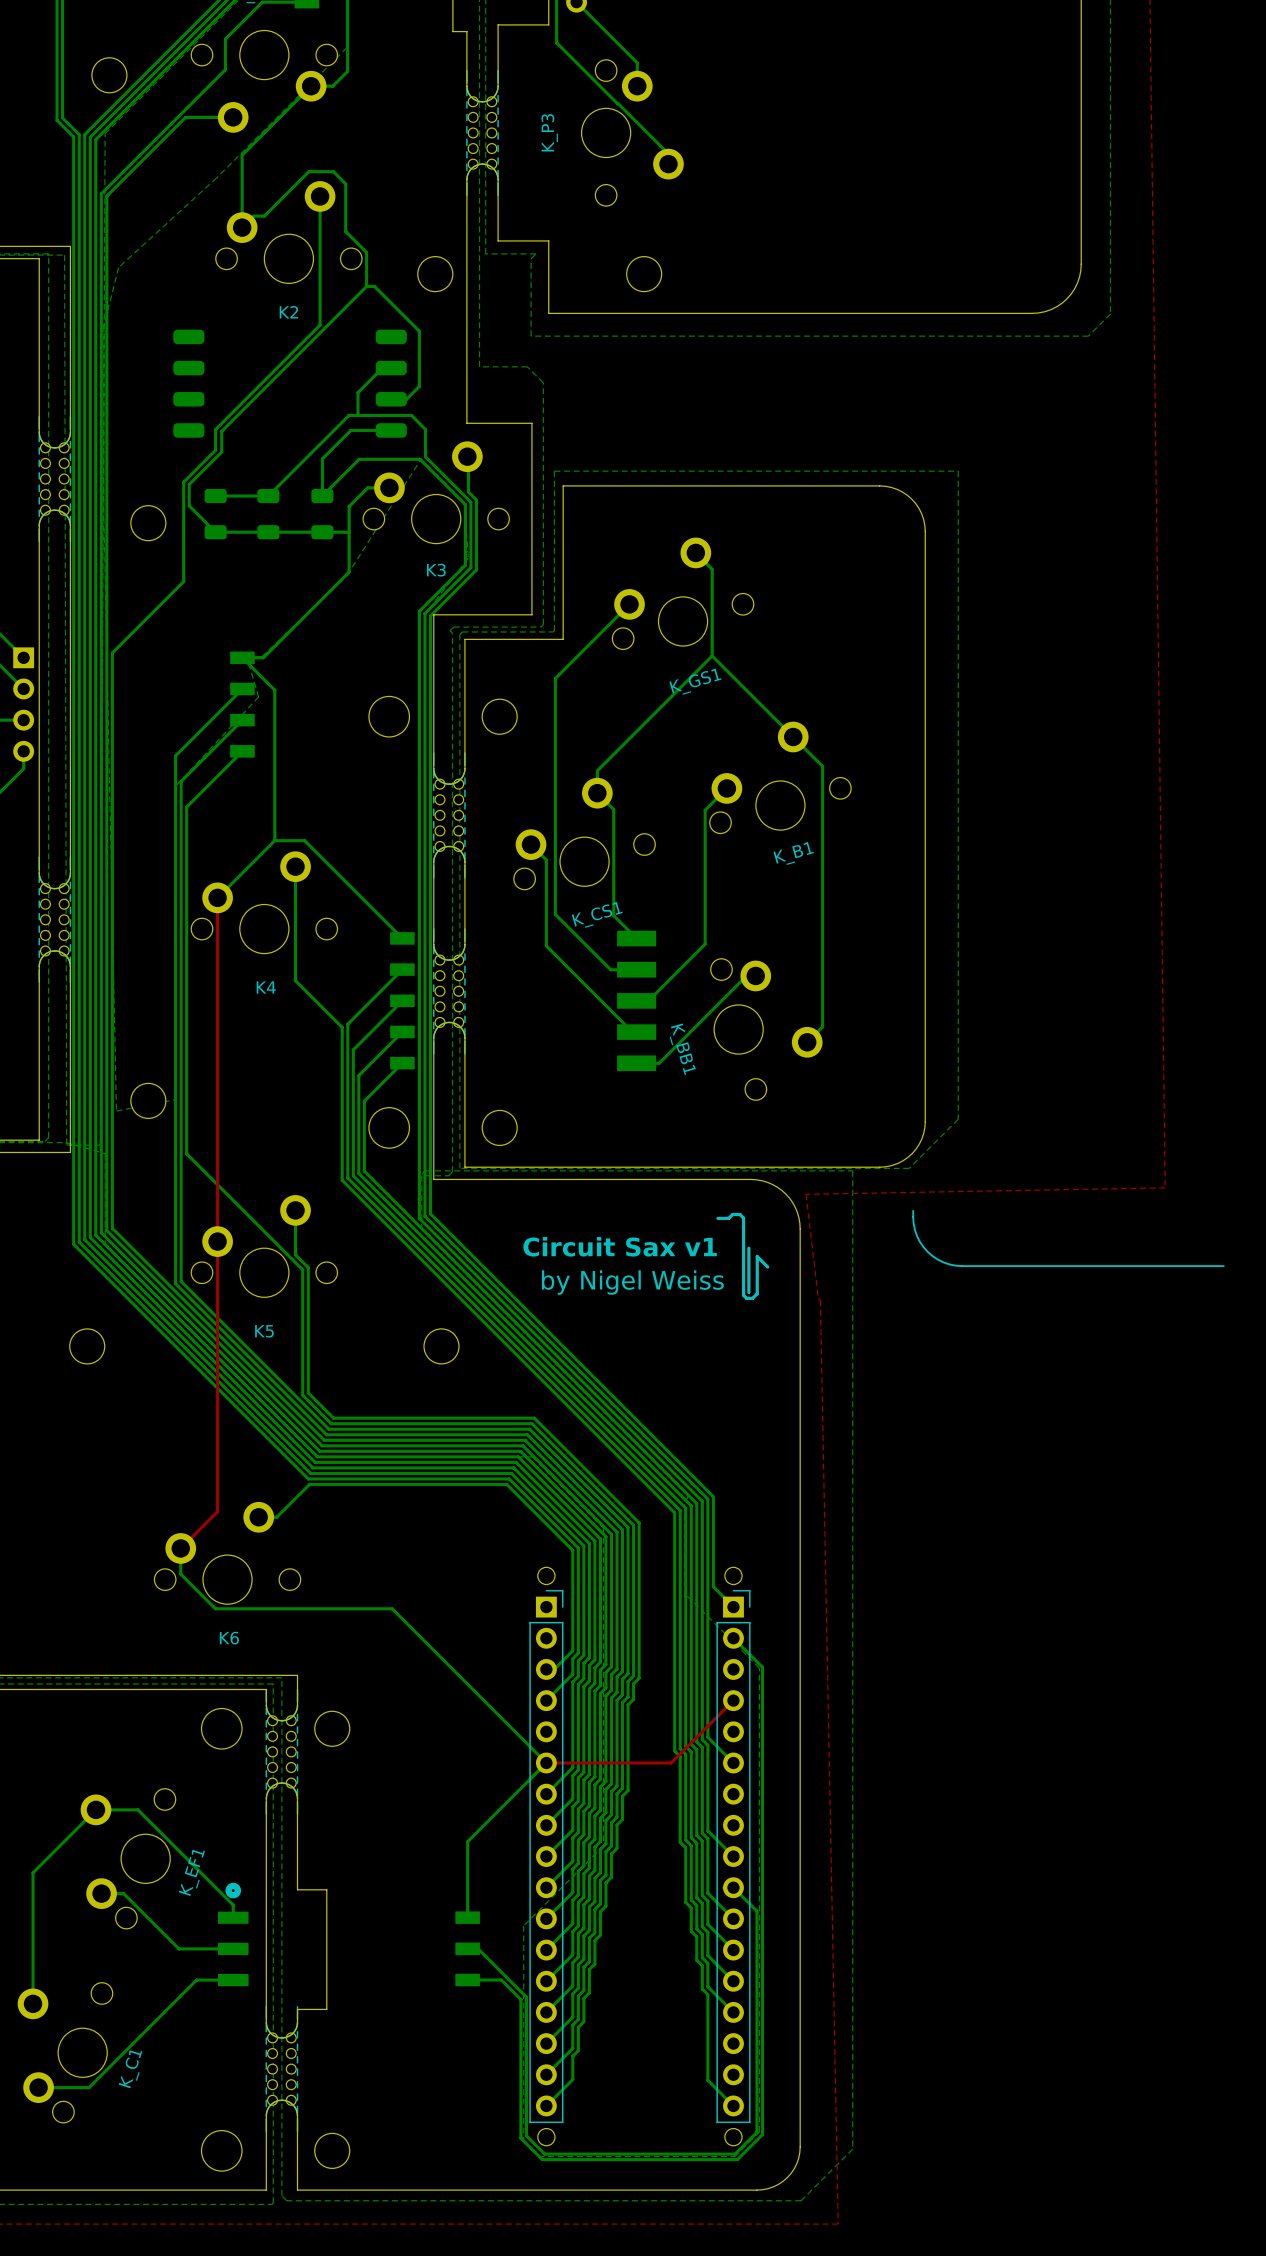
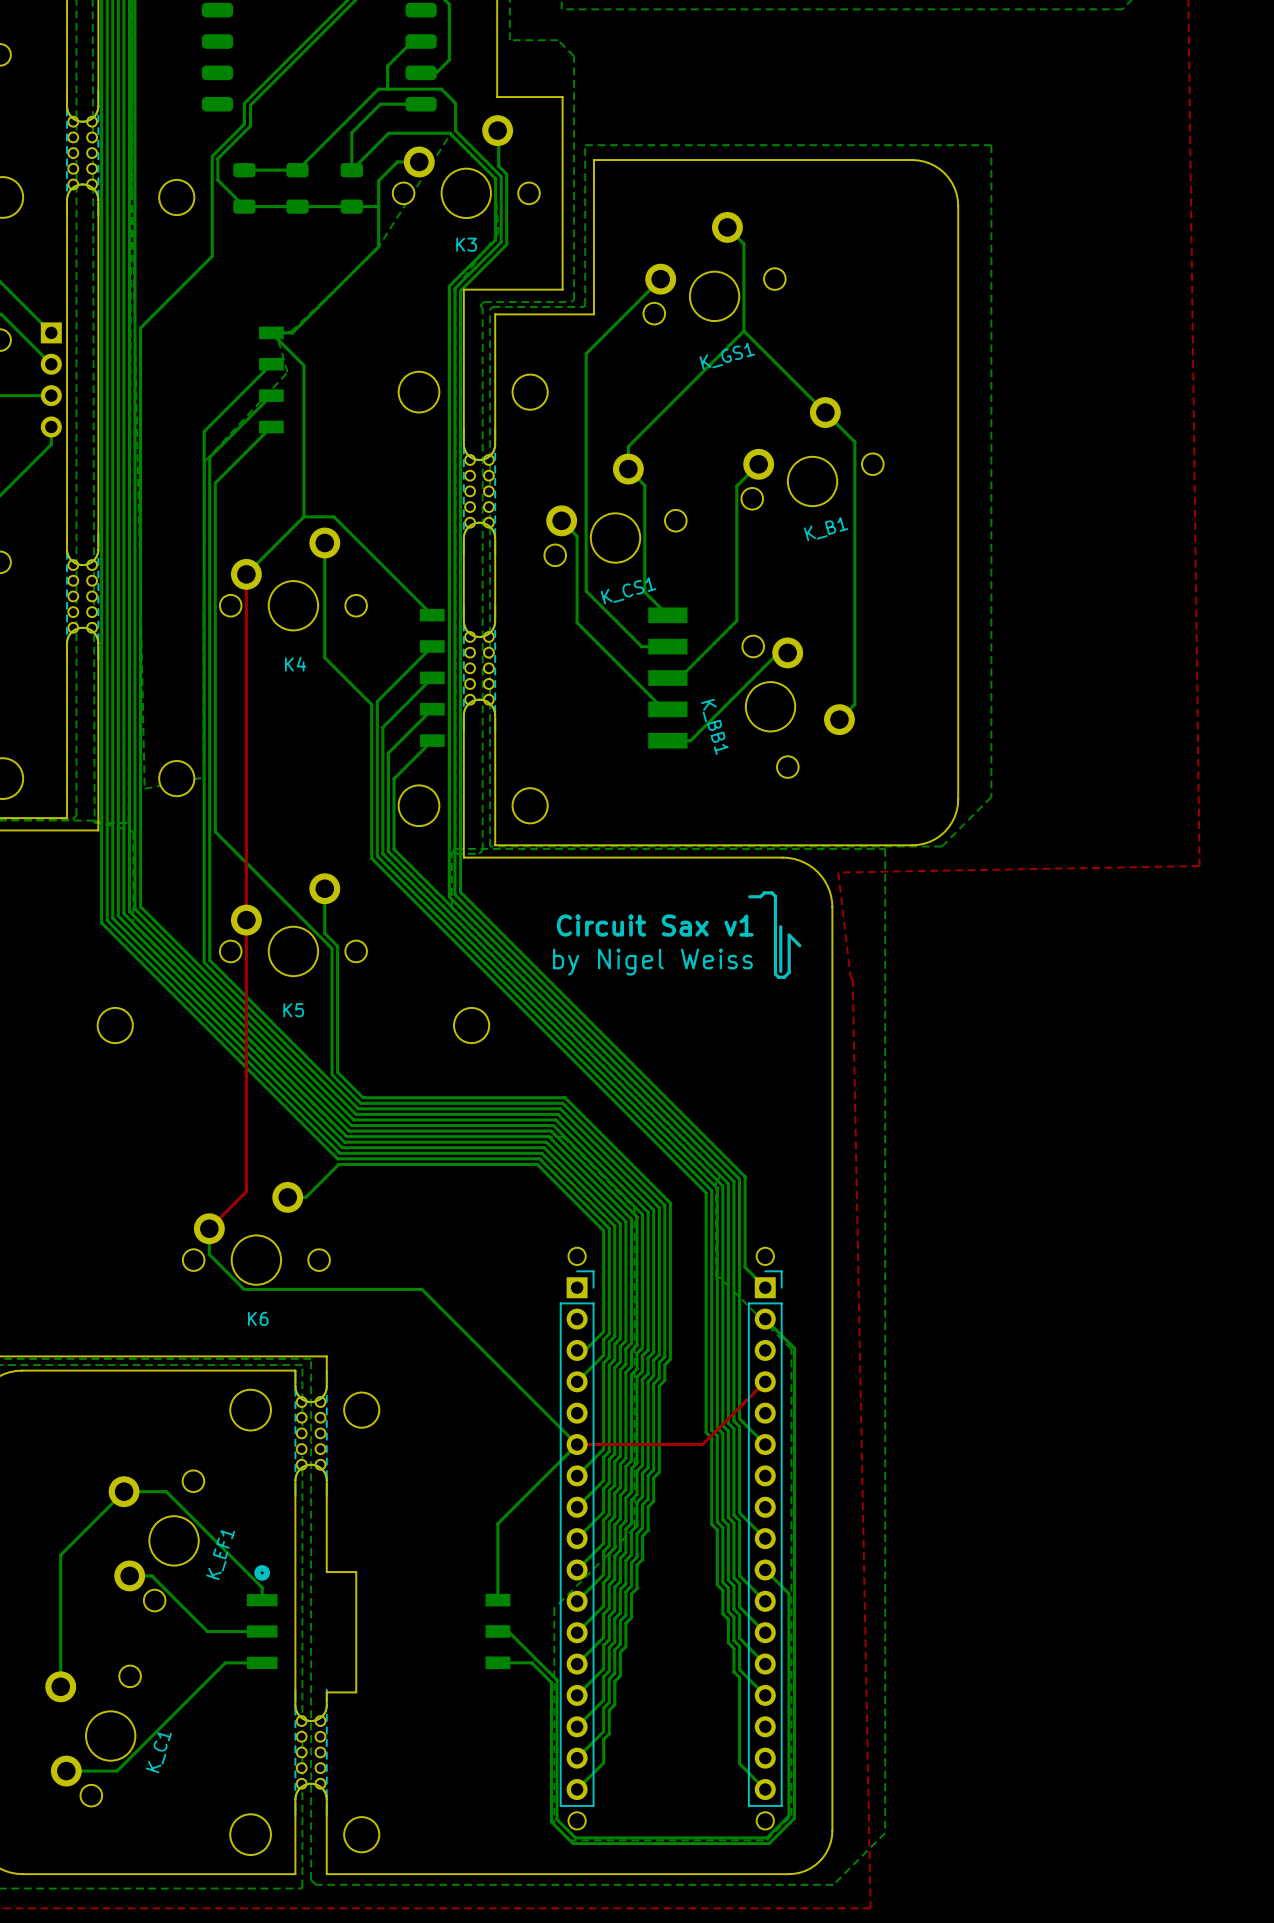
line: (913, 1210) (914, 1229) (923, 1246) (937, 1259) (955, 1265) (1223, 1266) -> none

